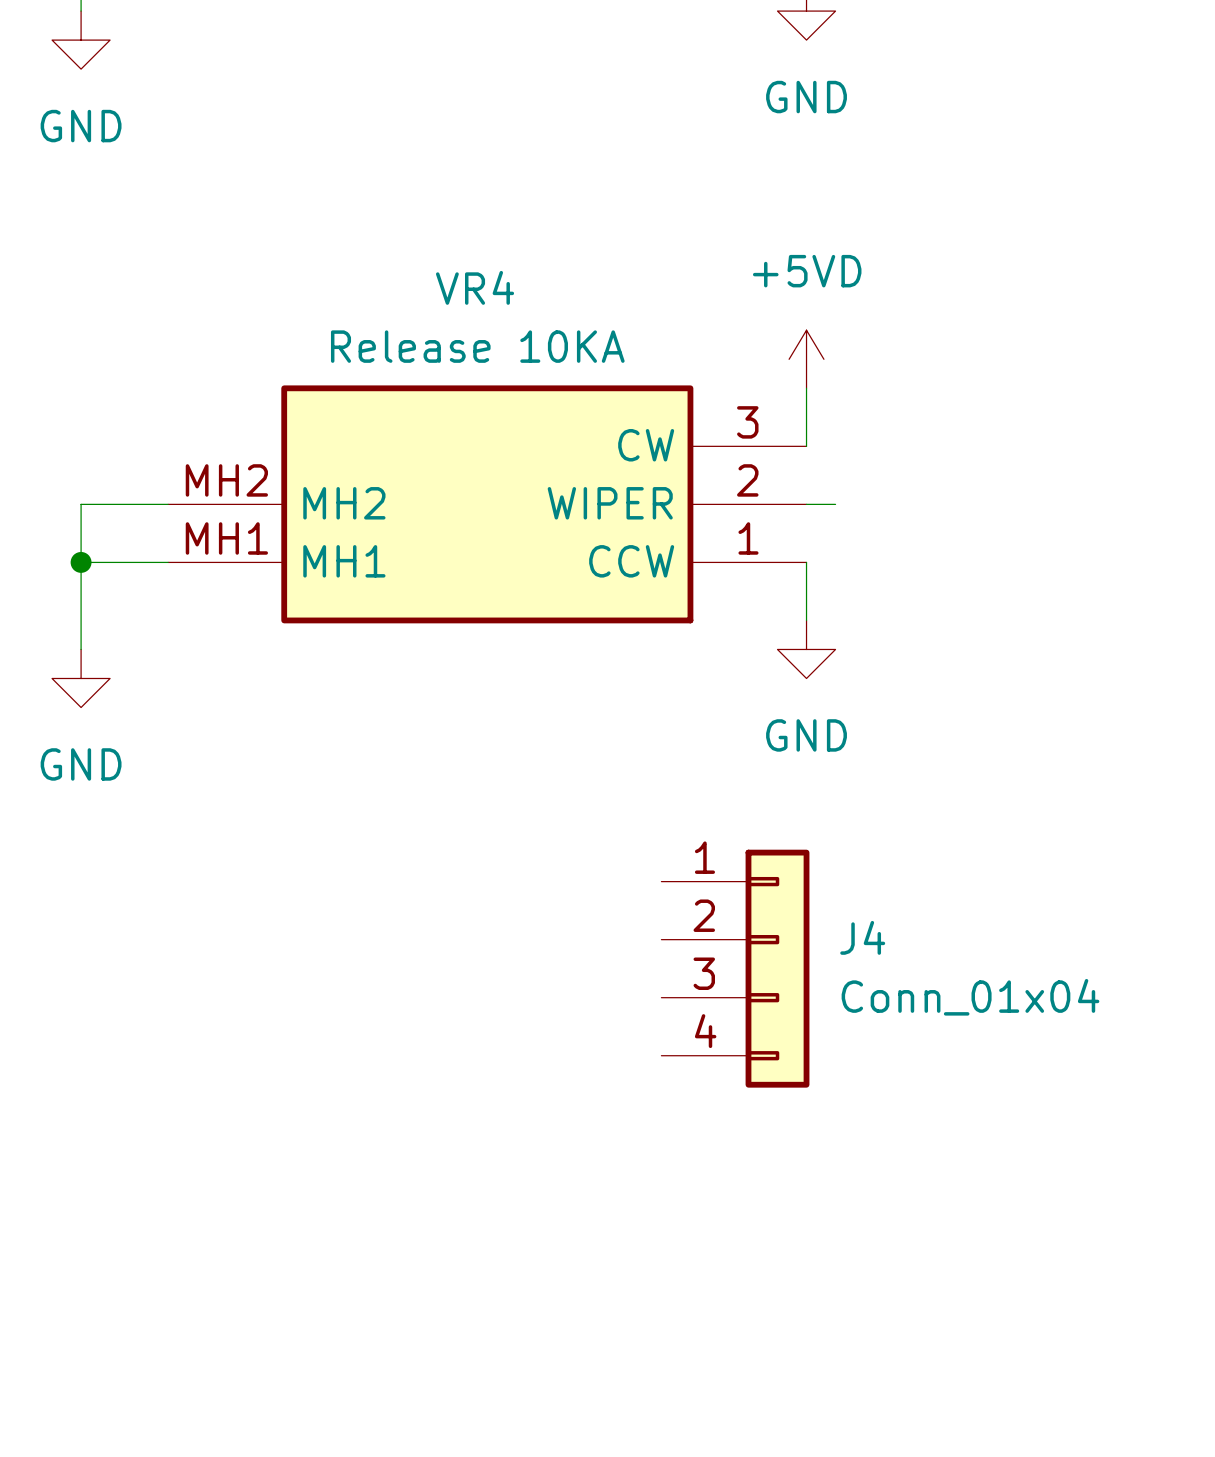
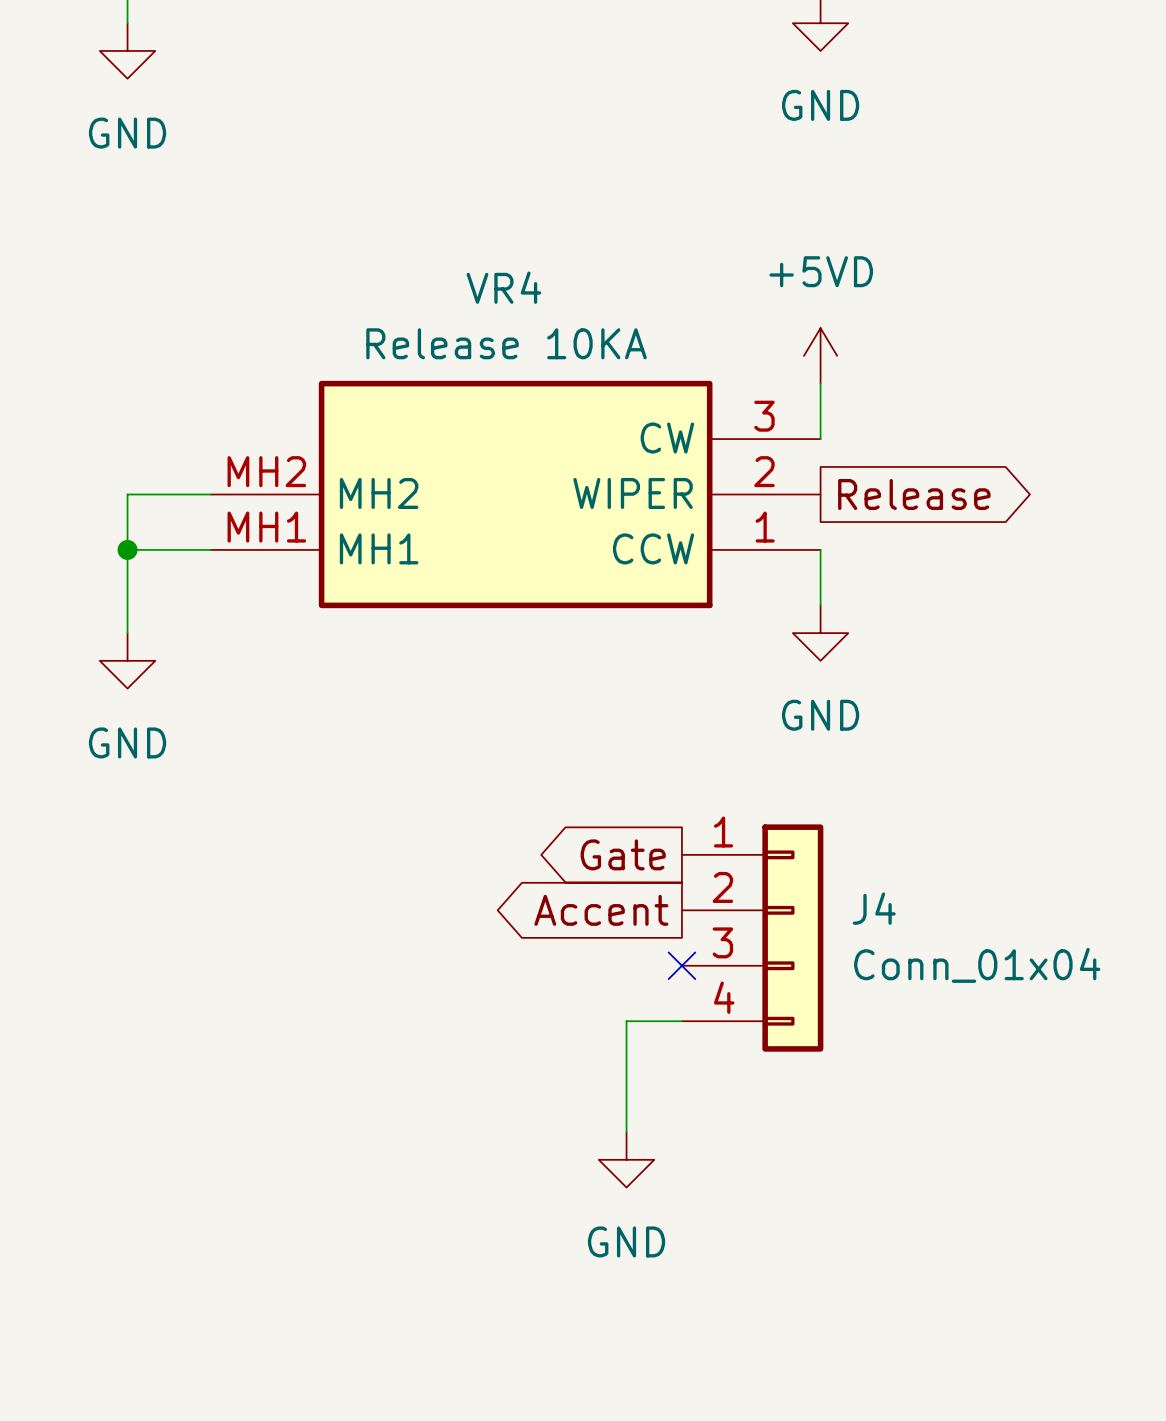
wire: (806, 504) (835, 504) -> none
global label: none -> Release (914, 494)
global label: none -> Gate (623, 854)
global label: none -> Accent (601, 910)
no-connect mark: none -> (681, 965)
wire: none -> (681, 1021) (626, 1021) (626, 1132)
power symbol: none -> GND (626, 1159)

